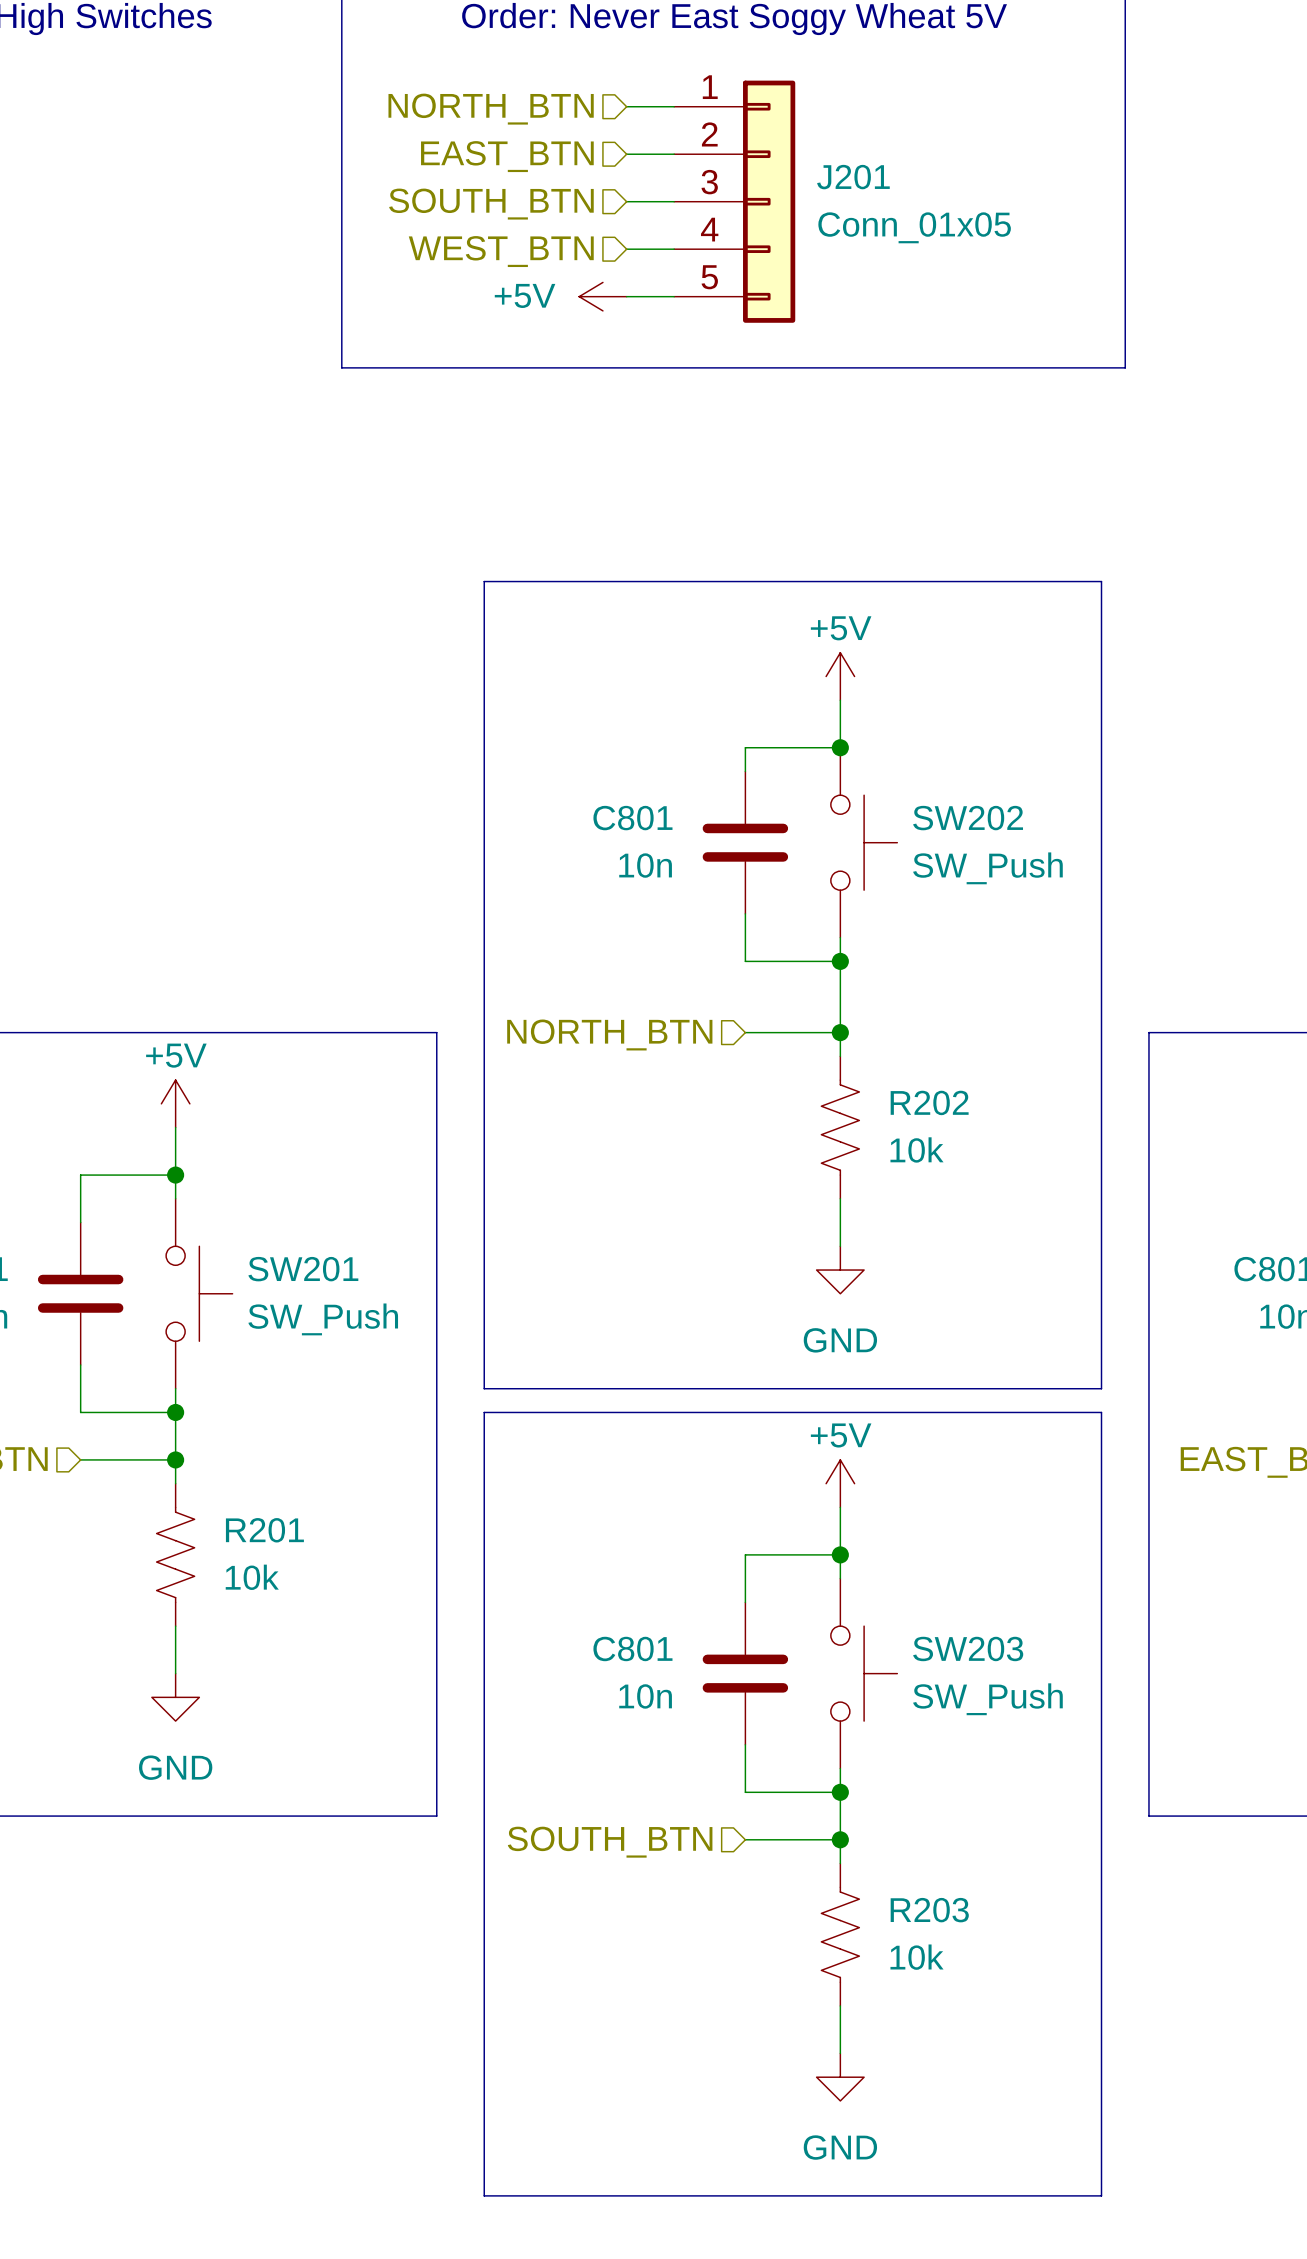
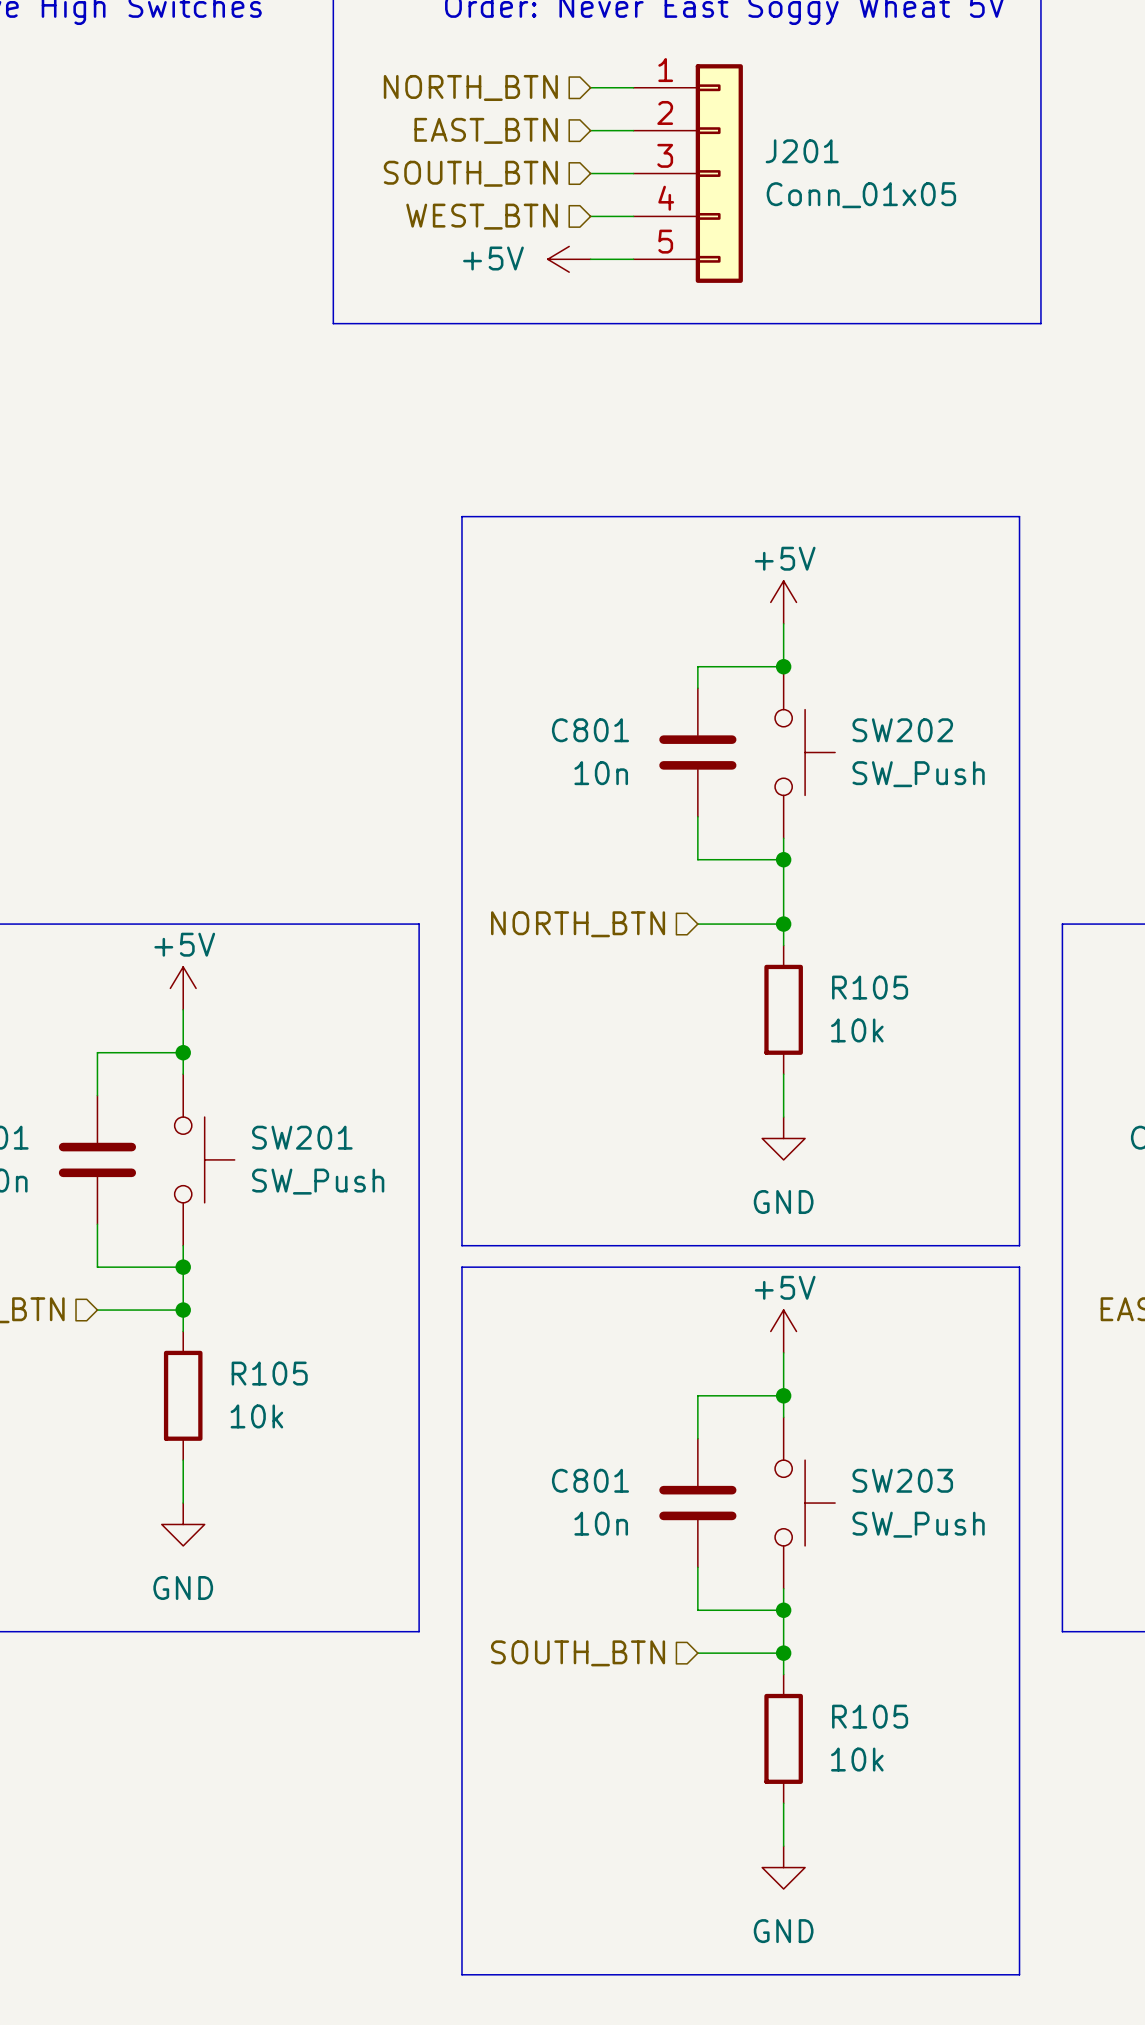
R202: 10k (840, 1127) -> none
R105: none -> 10k (783, 1009)
R201: 10k (175, 1554) -> none
R105: none -> 10k (183, 1395)
R203: 10k (840, 1934) -> none
R105: none -> 10k (783, 1738)

